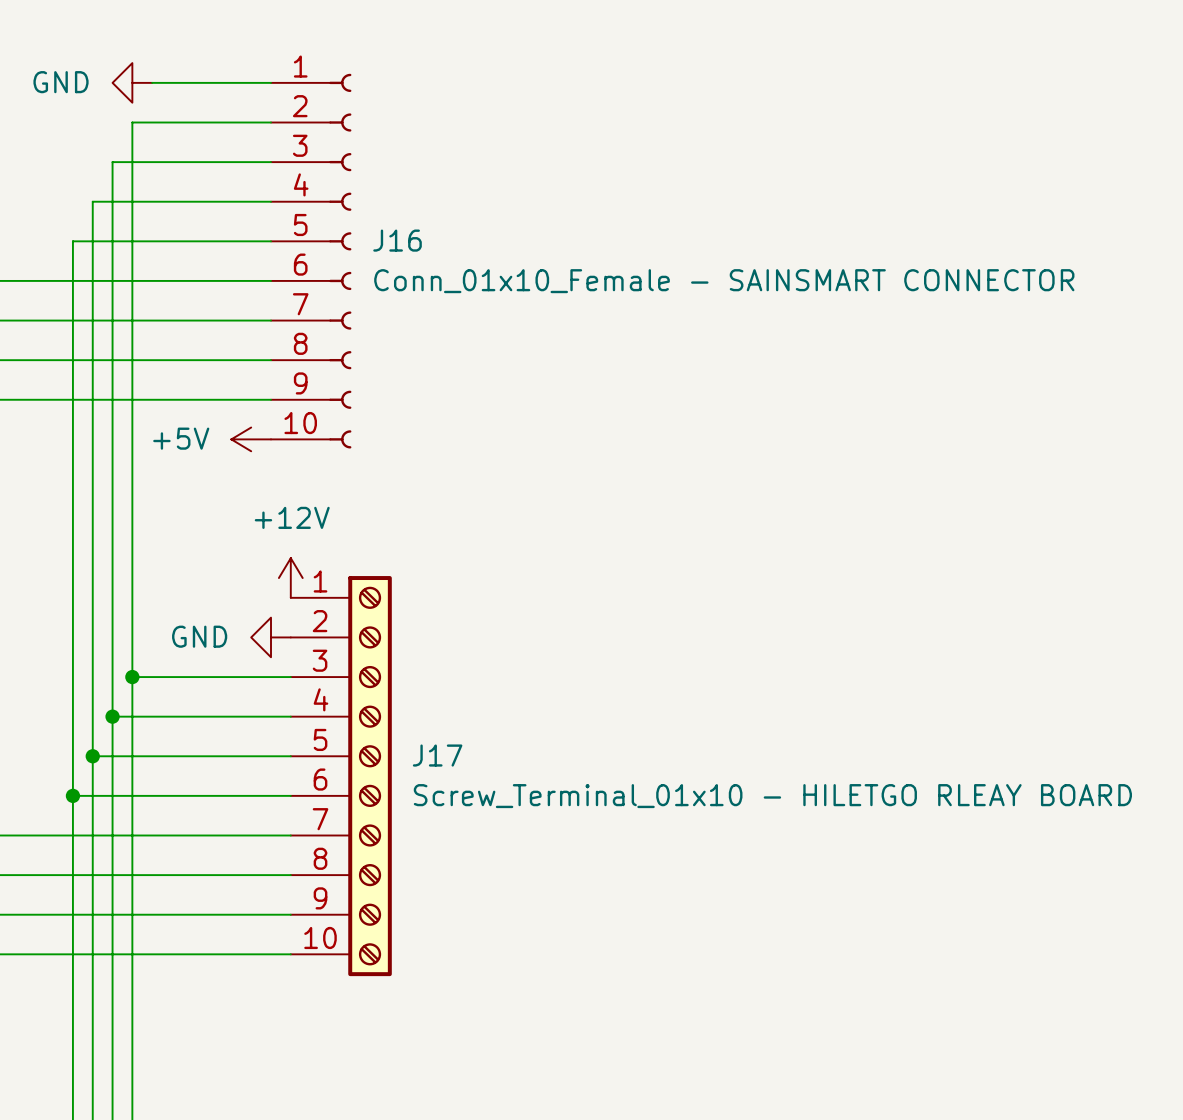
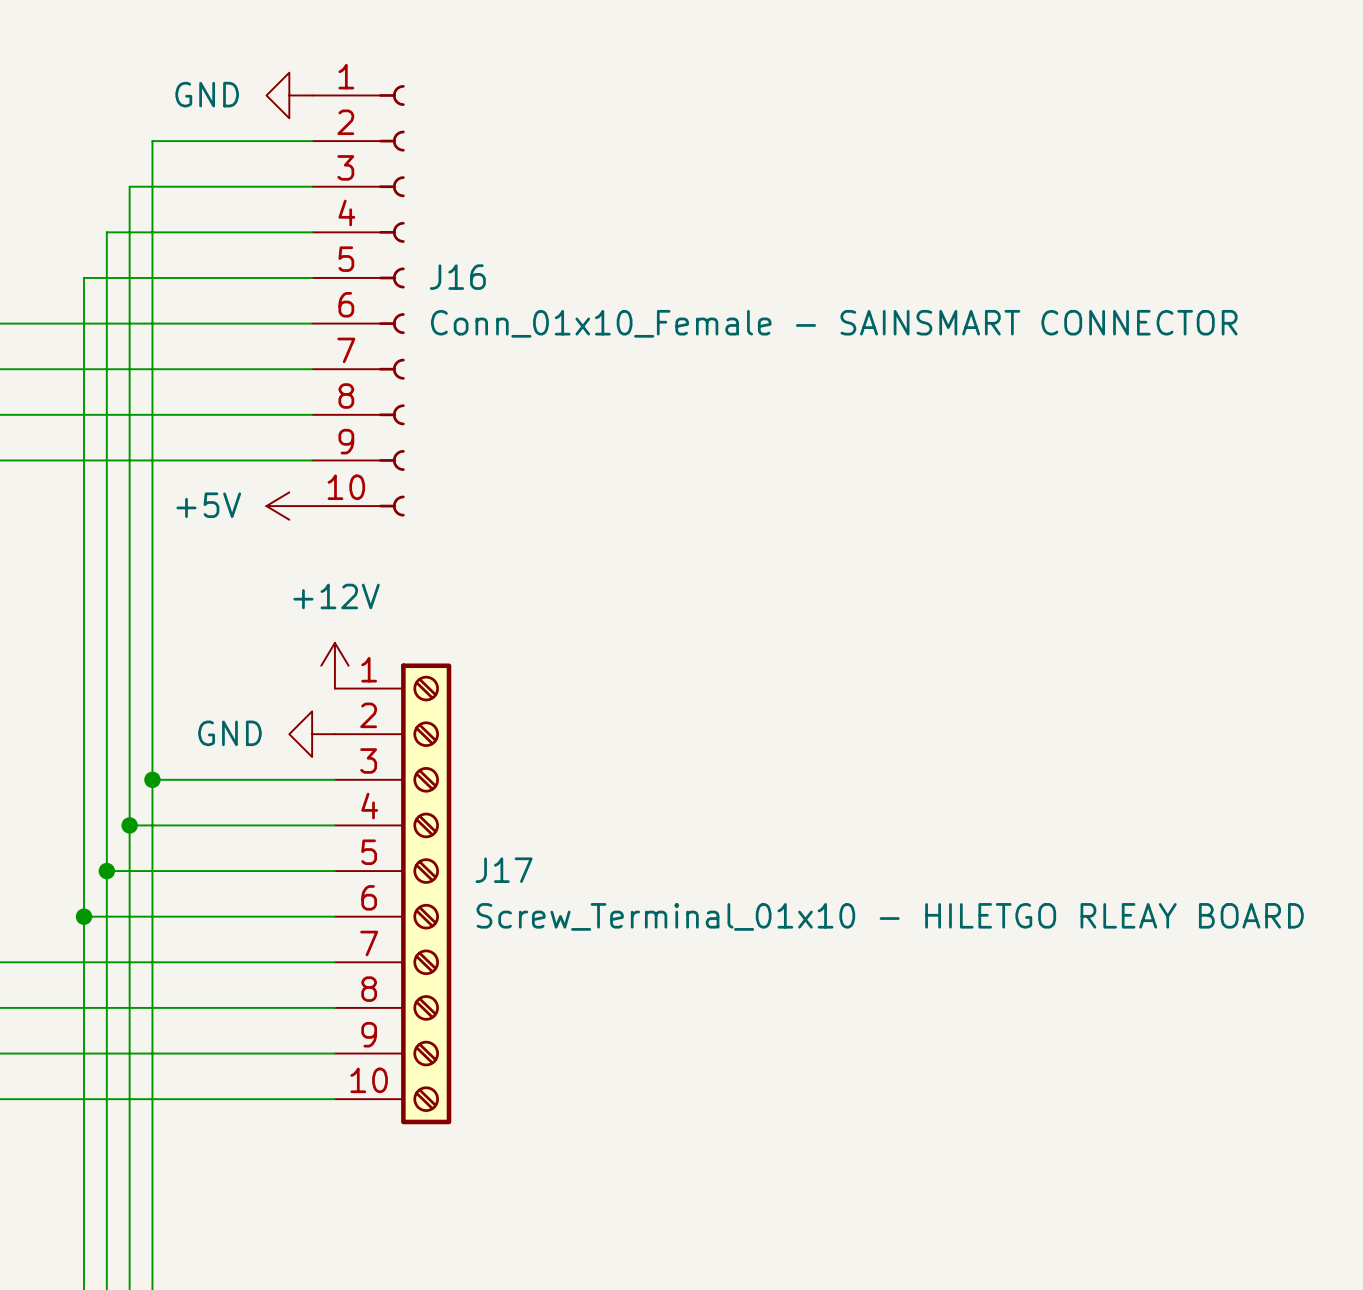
power symbol position: GND (132, 82) -> GND (289, 95)
wire: (152, 82) (271, 82) -> none

